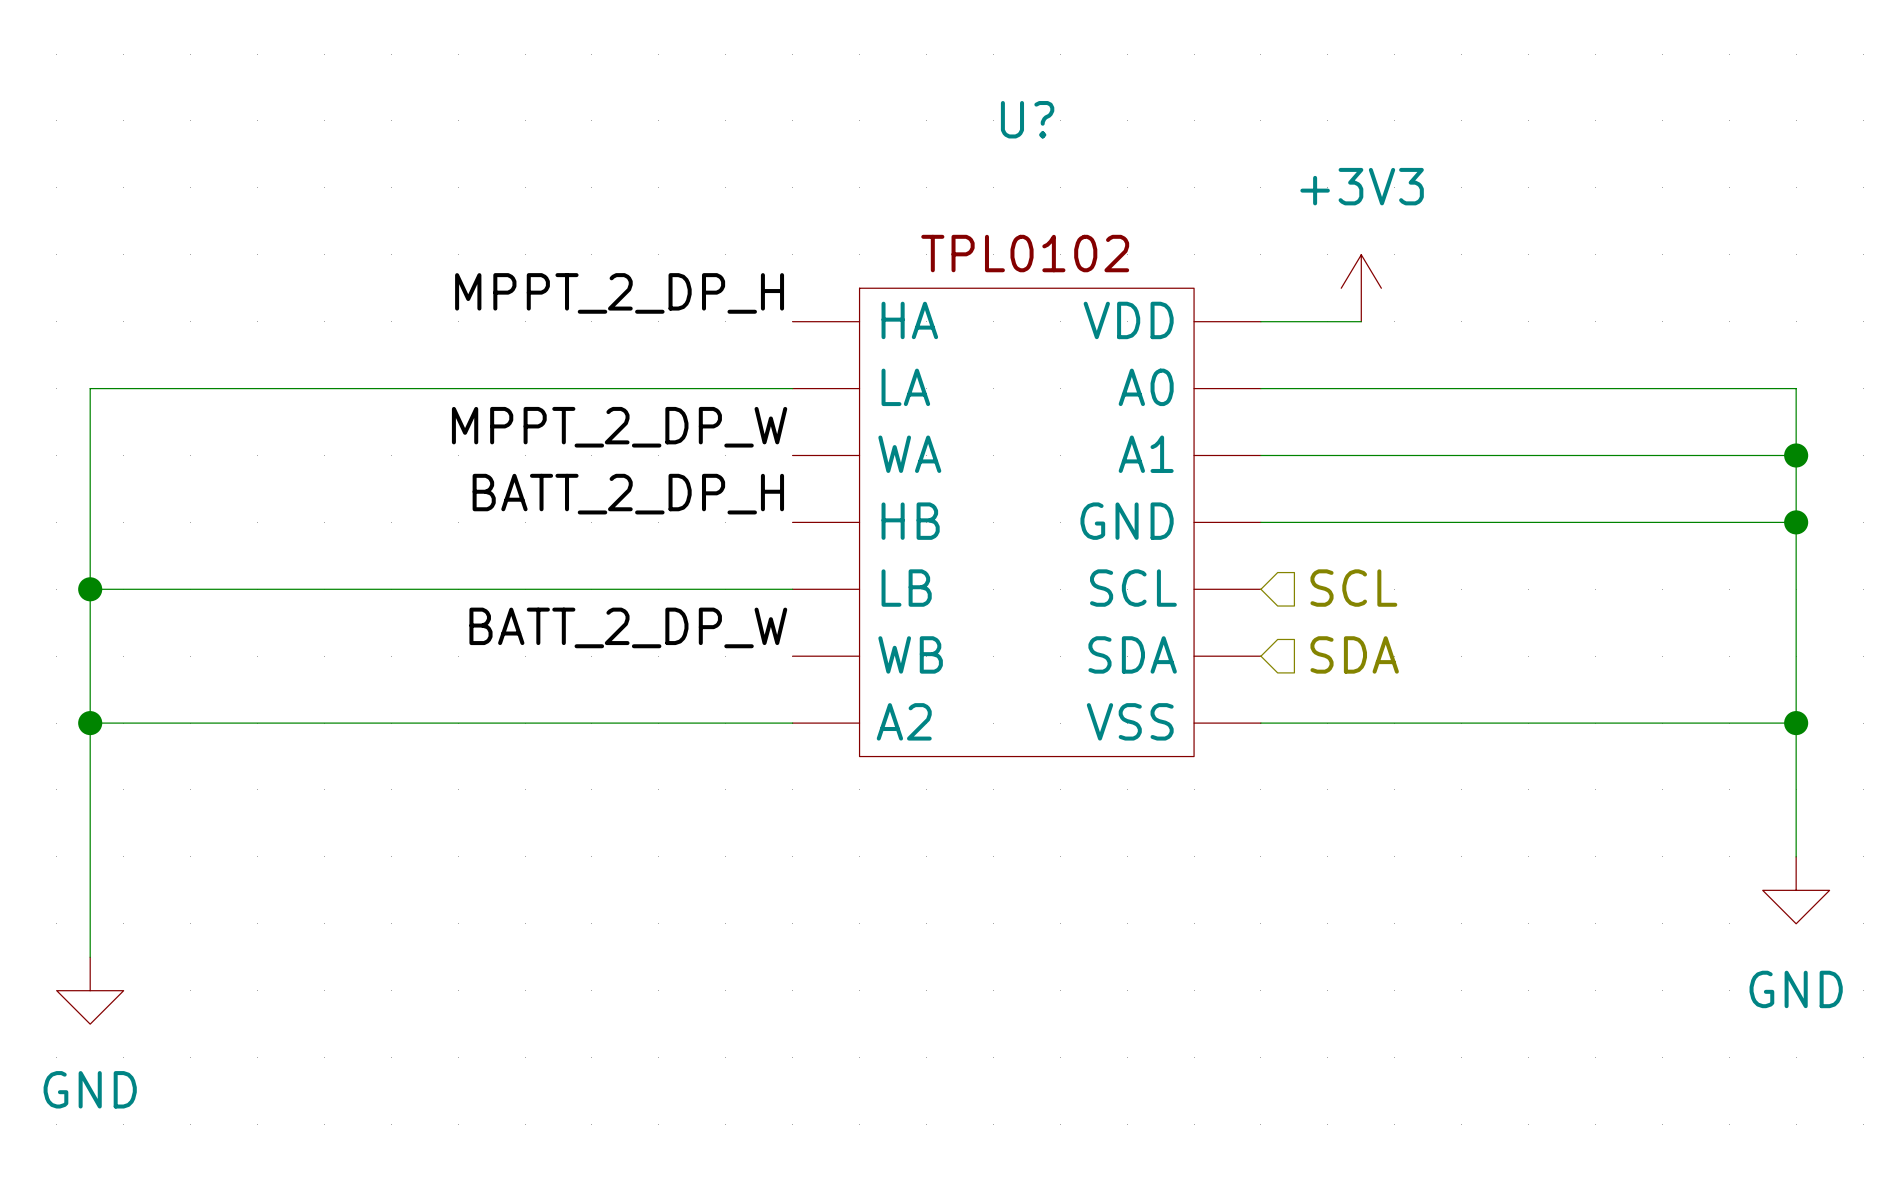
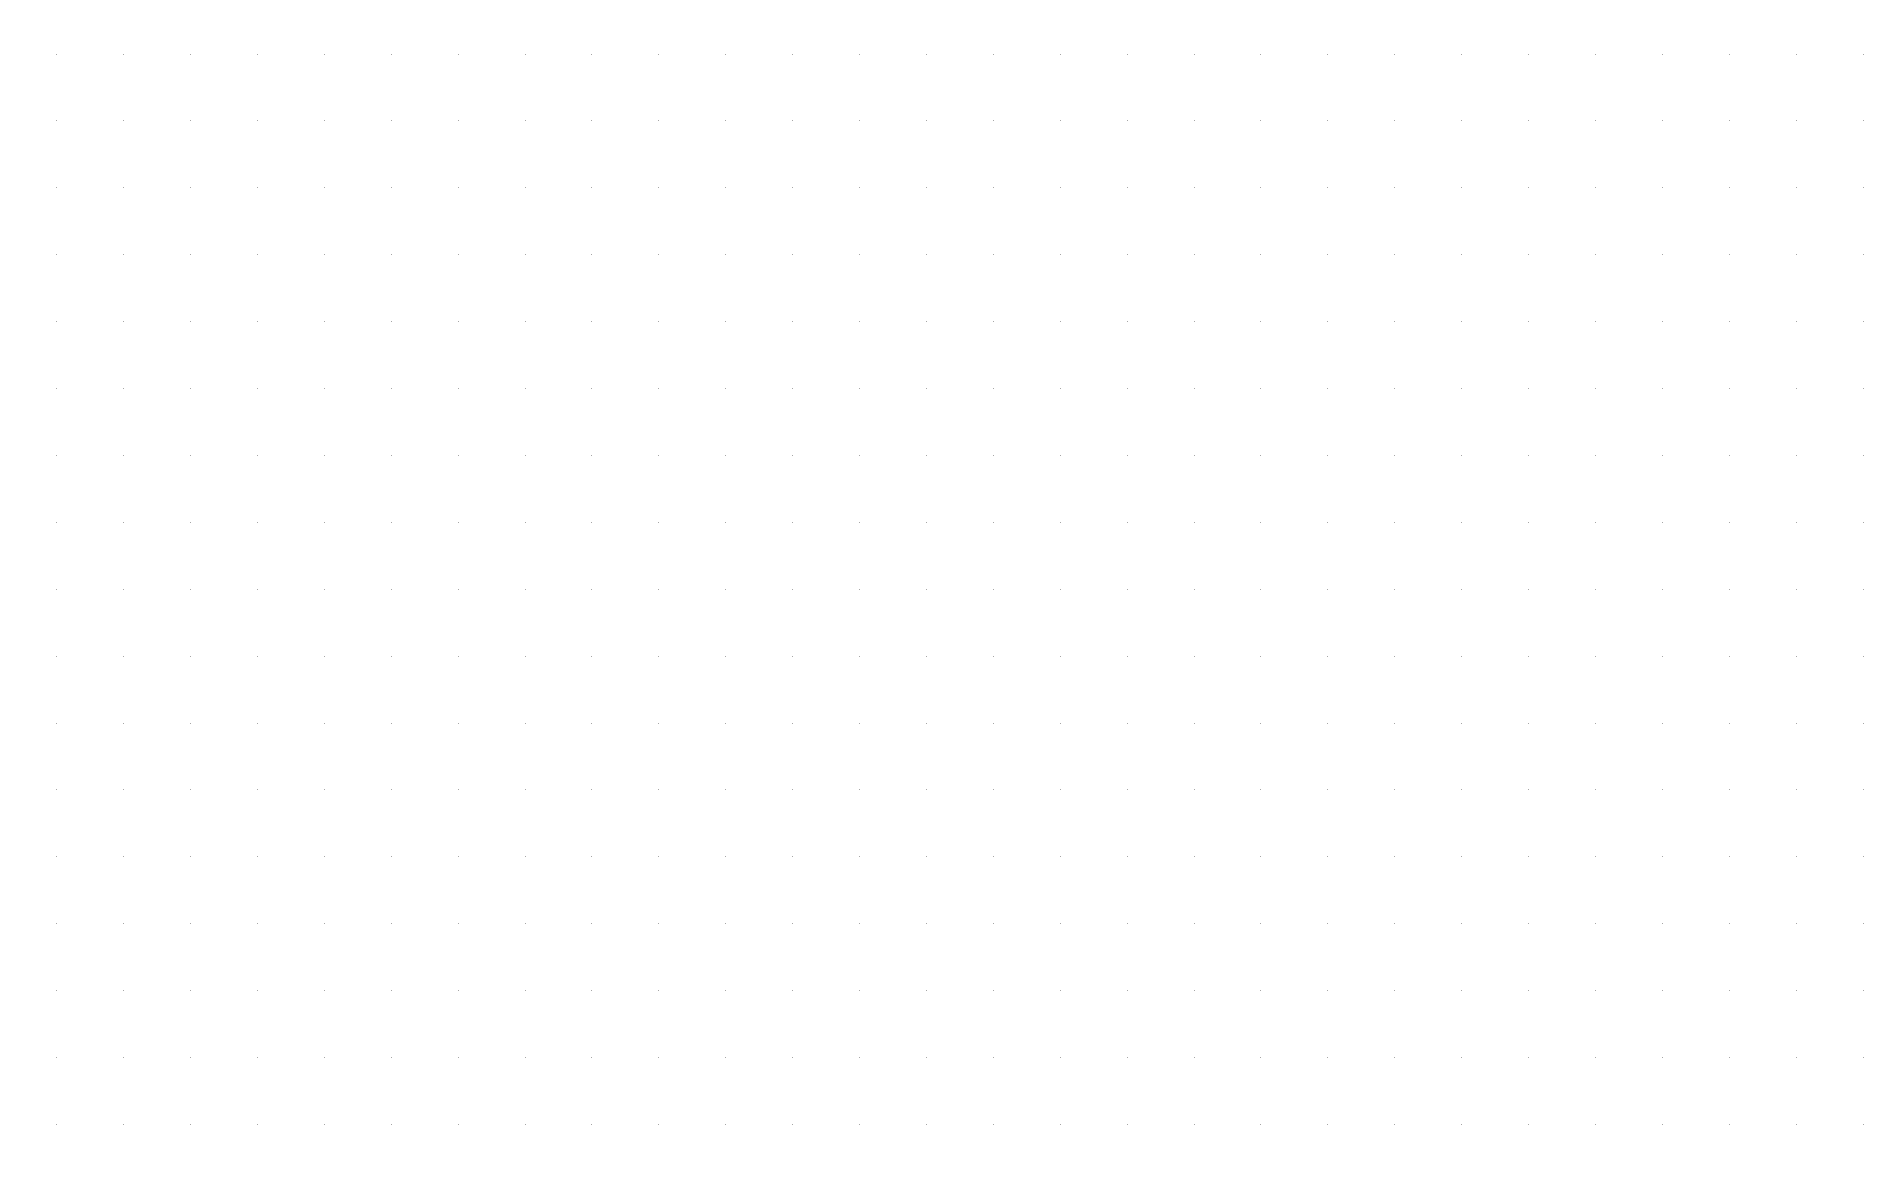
power symbol: +3V3 (1361, 288) -> none
label: MPPT_2_DP_H (619, 293) -> none
wire: (1260, 321) (1361, 321) -> none
wire: (792, 388) (90, 388) (90, 957) -> none
wire: (1260, 388) (1796, 388) (1796, 856) -> none
label: MPPT_2_DP_W (619, 427) -> none
wire: (1260, 455) (1796, 455) -> none
junction: (1796, 455) -> none
label: BATT_2_DP_H (628, 494) -> none
U?: (1026, 522) -> none
wire: (1260, 522) (1796, 522) -> none
junction: (1796, 522) -> none
hierarchical label: SCL (1353, 588) -> none
wire: (90, 589) (792, 589) -> none
junction: (90, 589) -> none
label: BATT_2_DP_W (628, 627) -> none
hierarchical label: SDA (1354, 654) -> none
wire: (90, 723) (792, 723) -> none
junction: (90, 723) -> none
wire: (1260, 723) (1796, 723) -> none
junction: (1796, 723) -> none
power symbol: GND (1796, 890) -> none
power symbol: GND (90, 990) -> none

